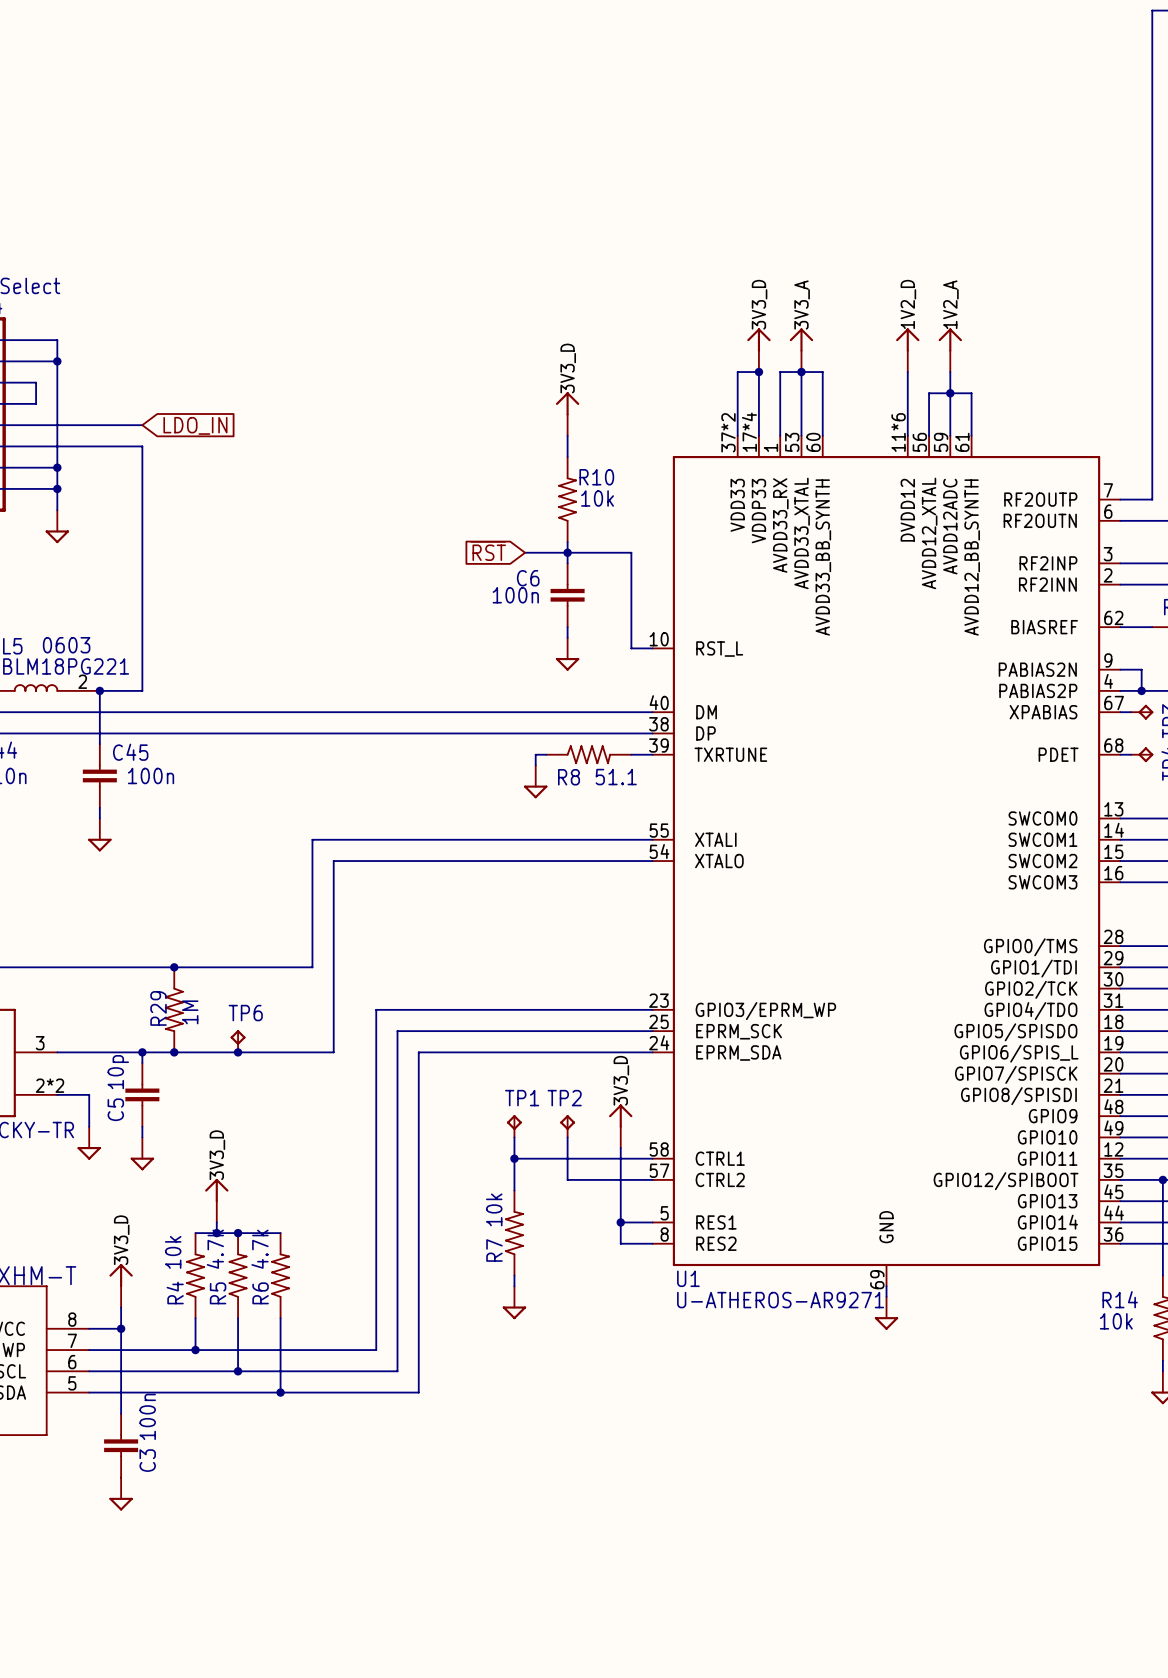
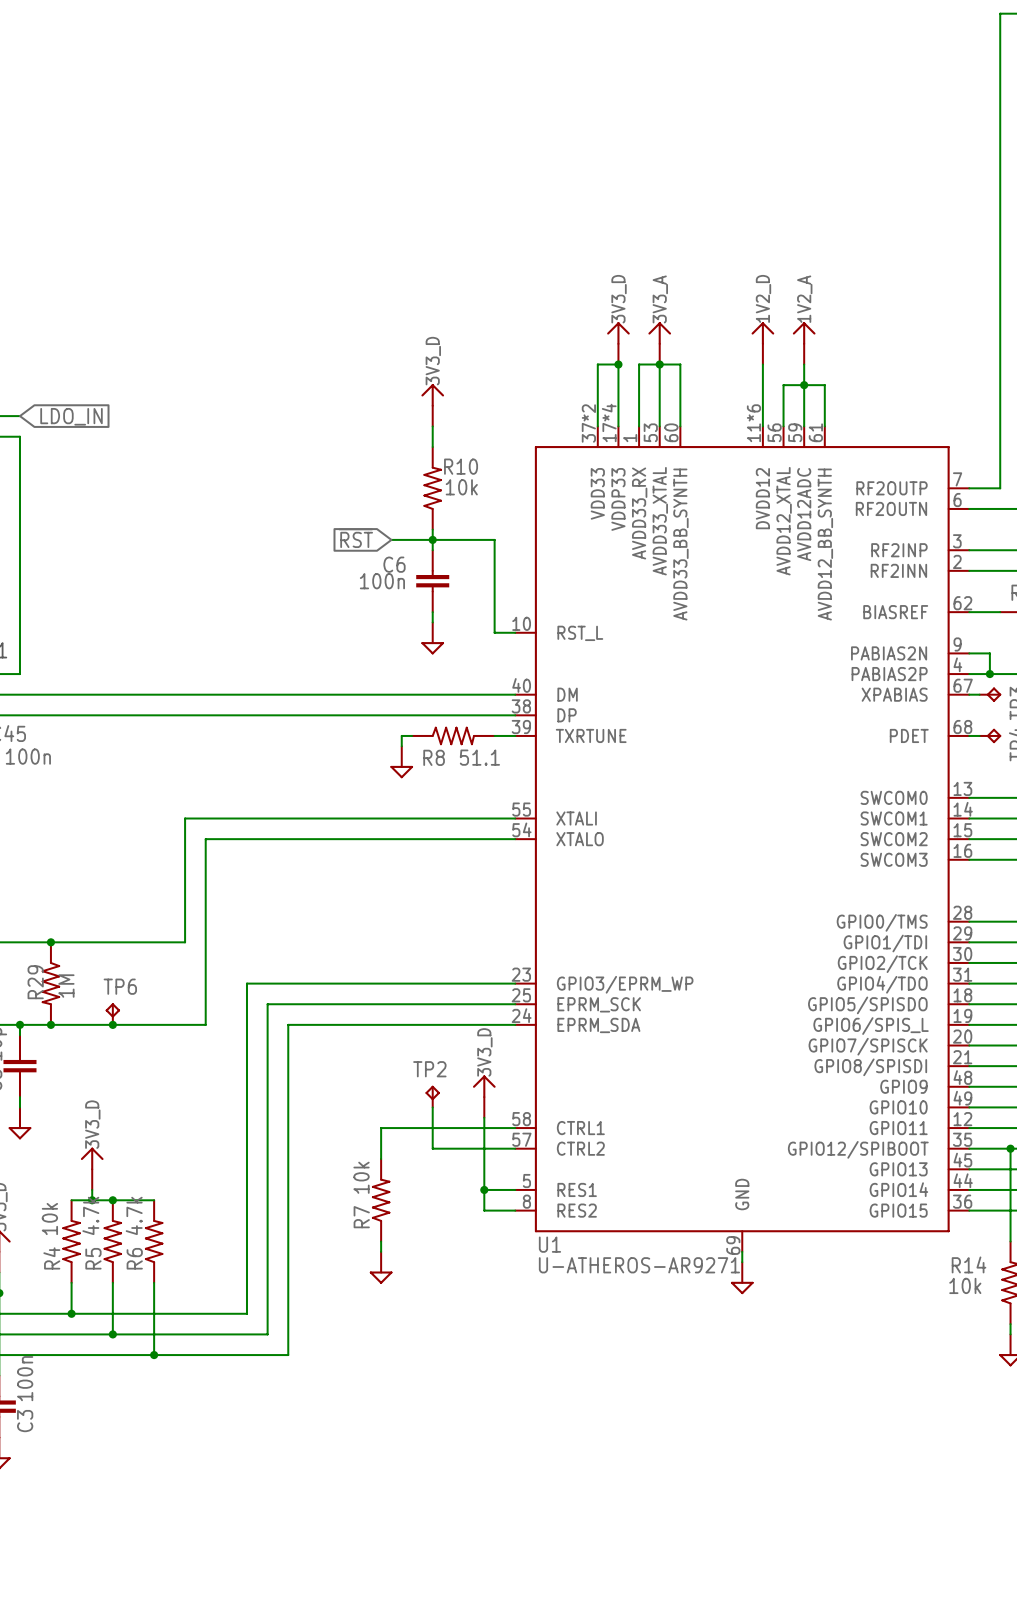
TP1: (514, 1126) -> none
wire: (514, 1137) (514, 1158) -> none
junction: (514, 1158) -> none

